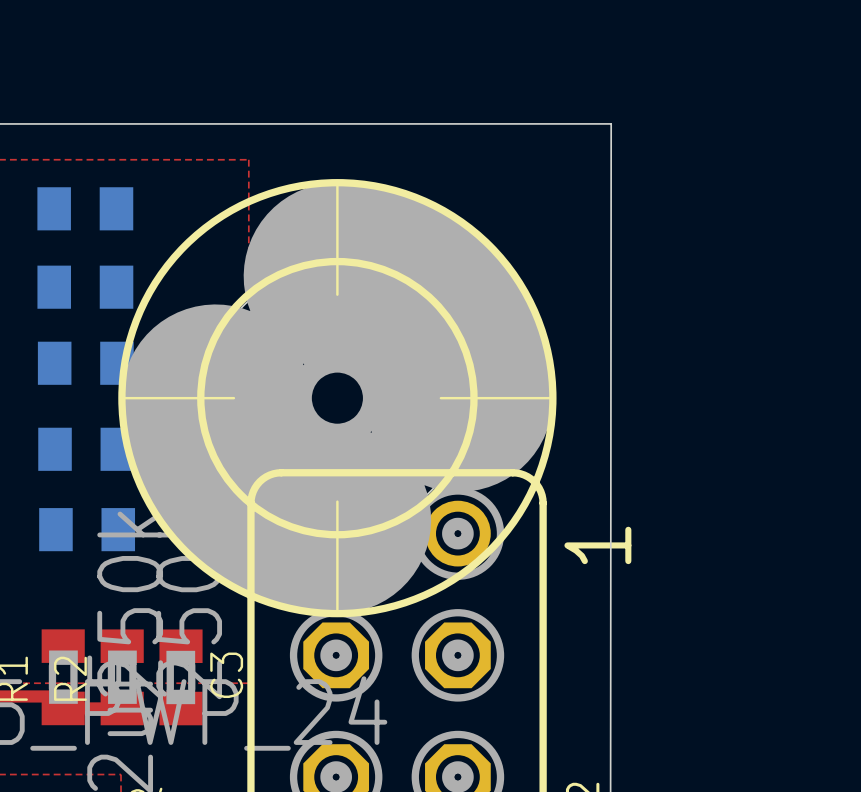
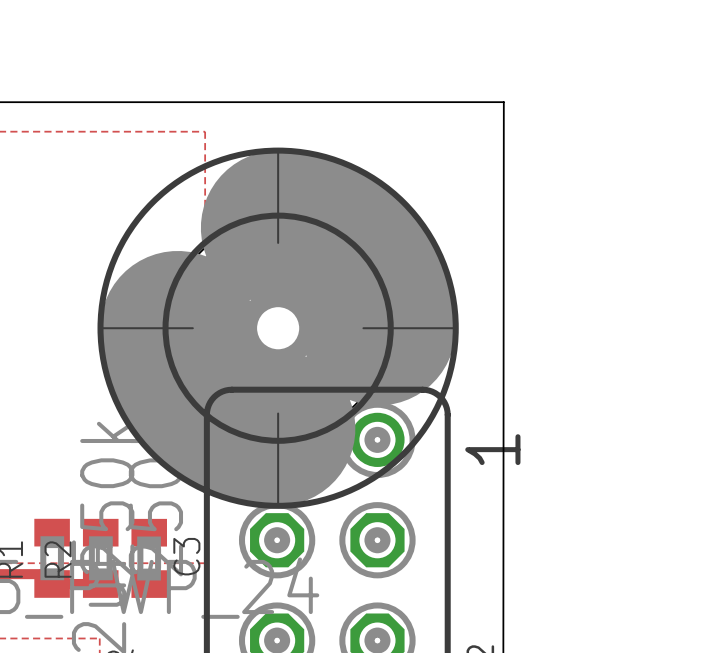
part: (85, 208) -> none
part: (85, 287) -> none
part: (85, 363) -> none
part: (86, 449) -> none
part: (87, 529) -> none

